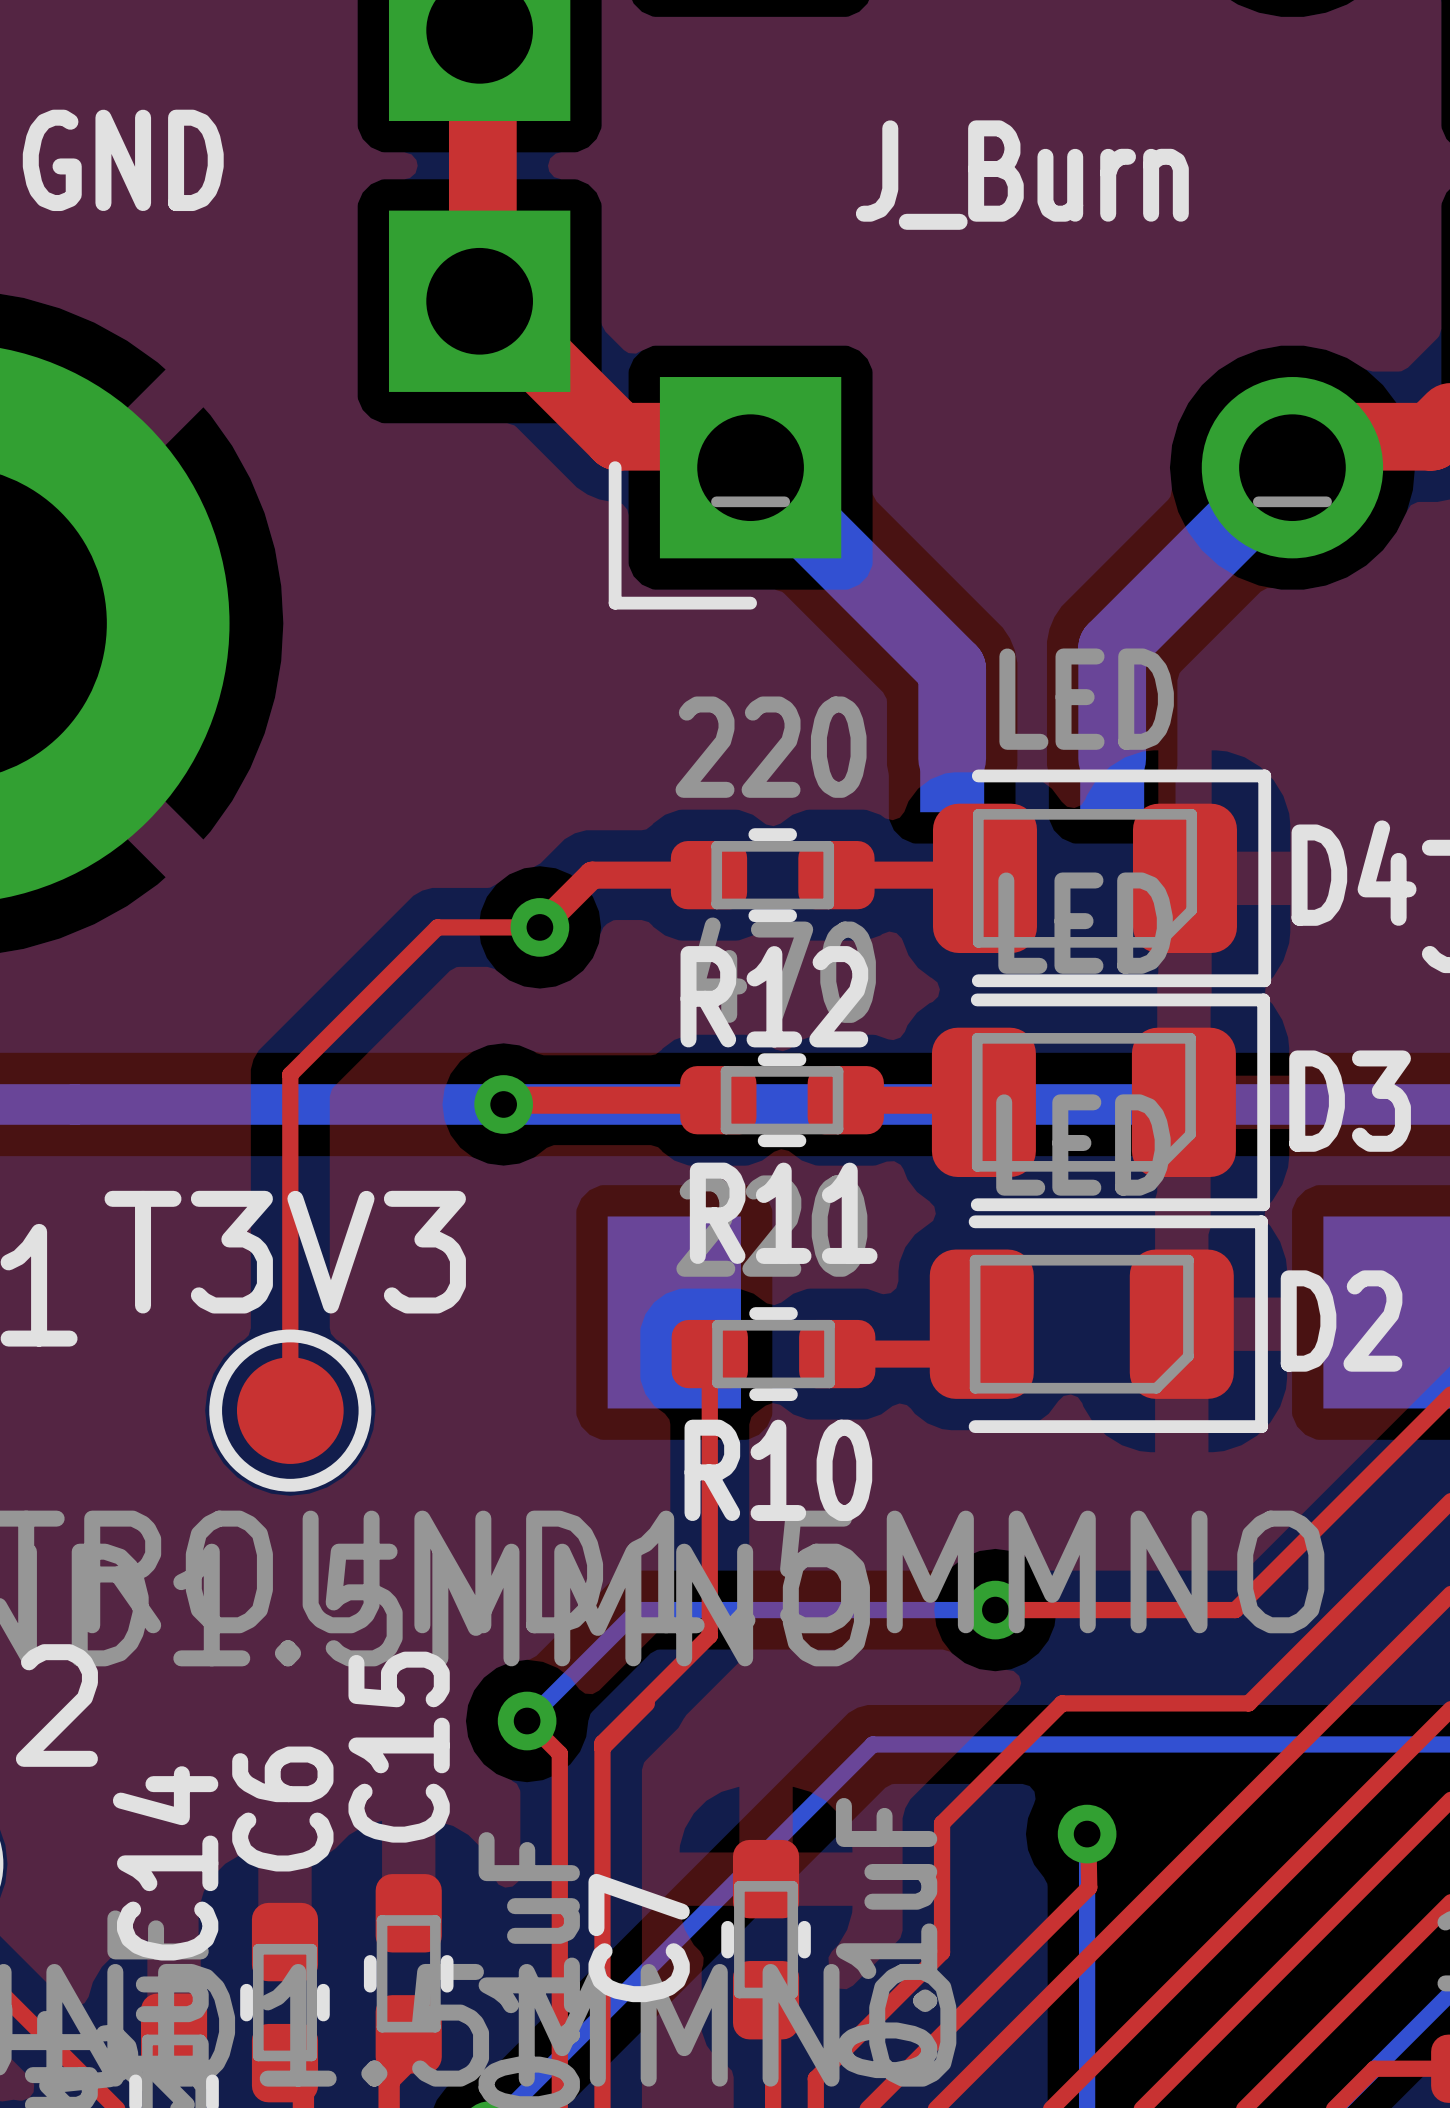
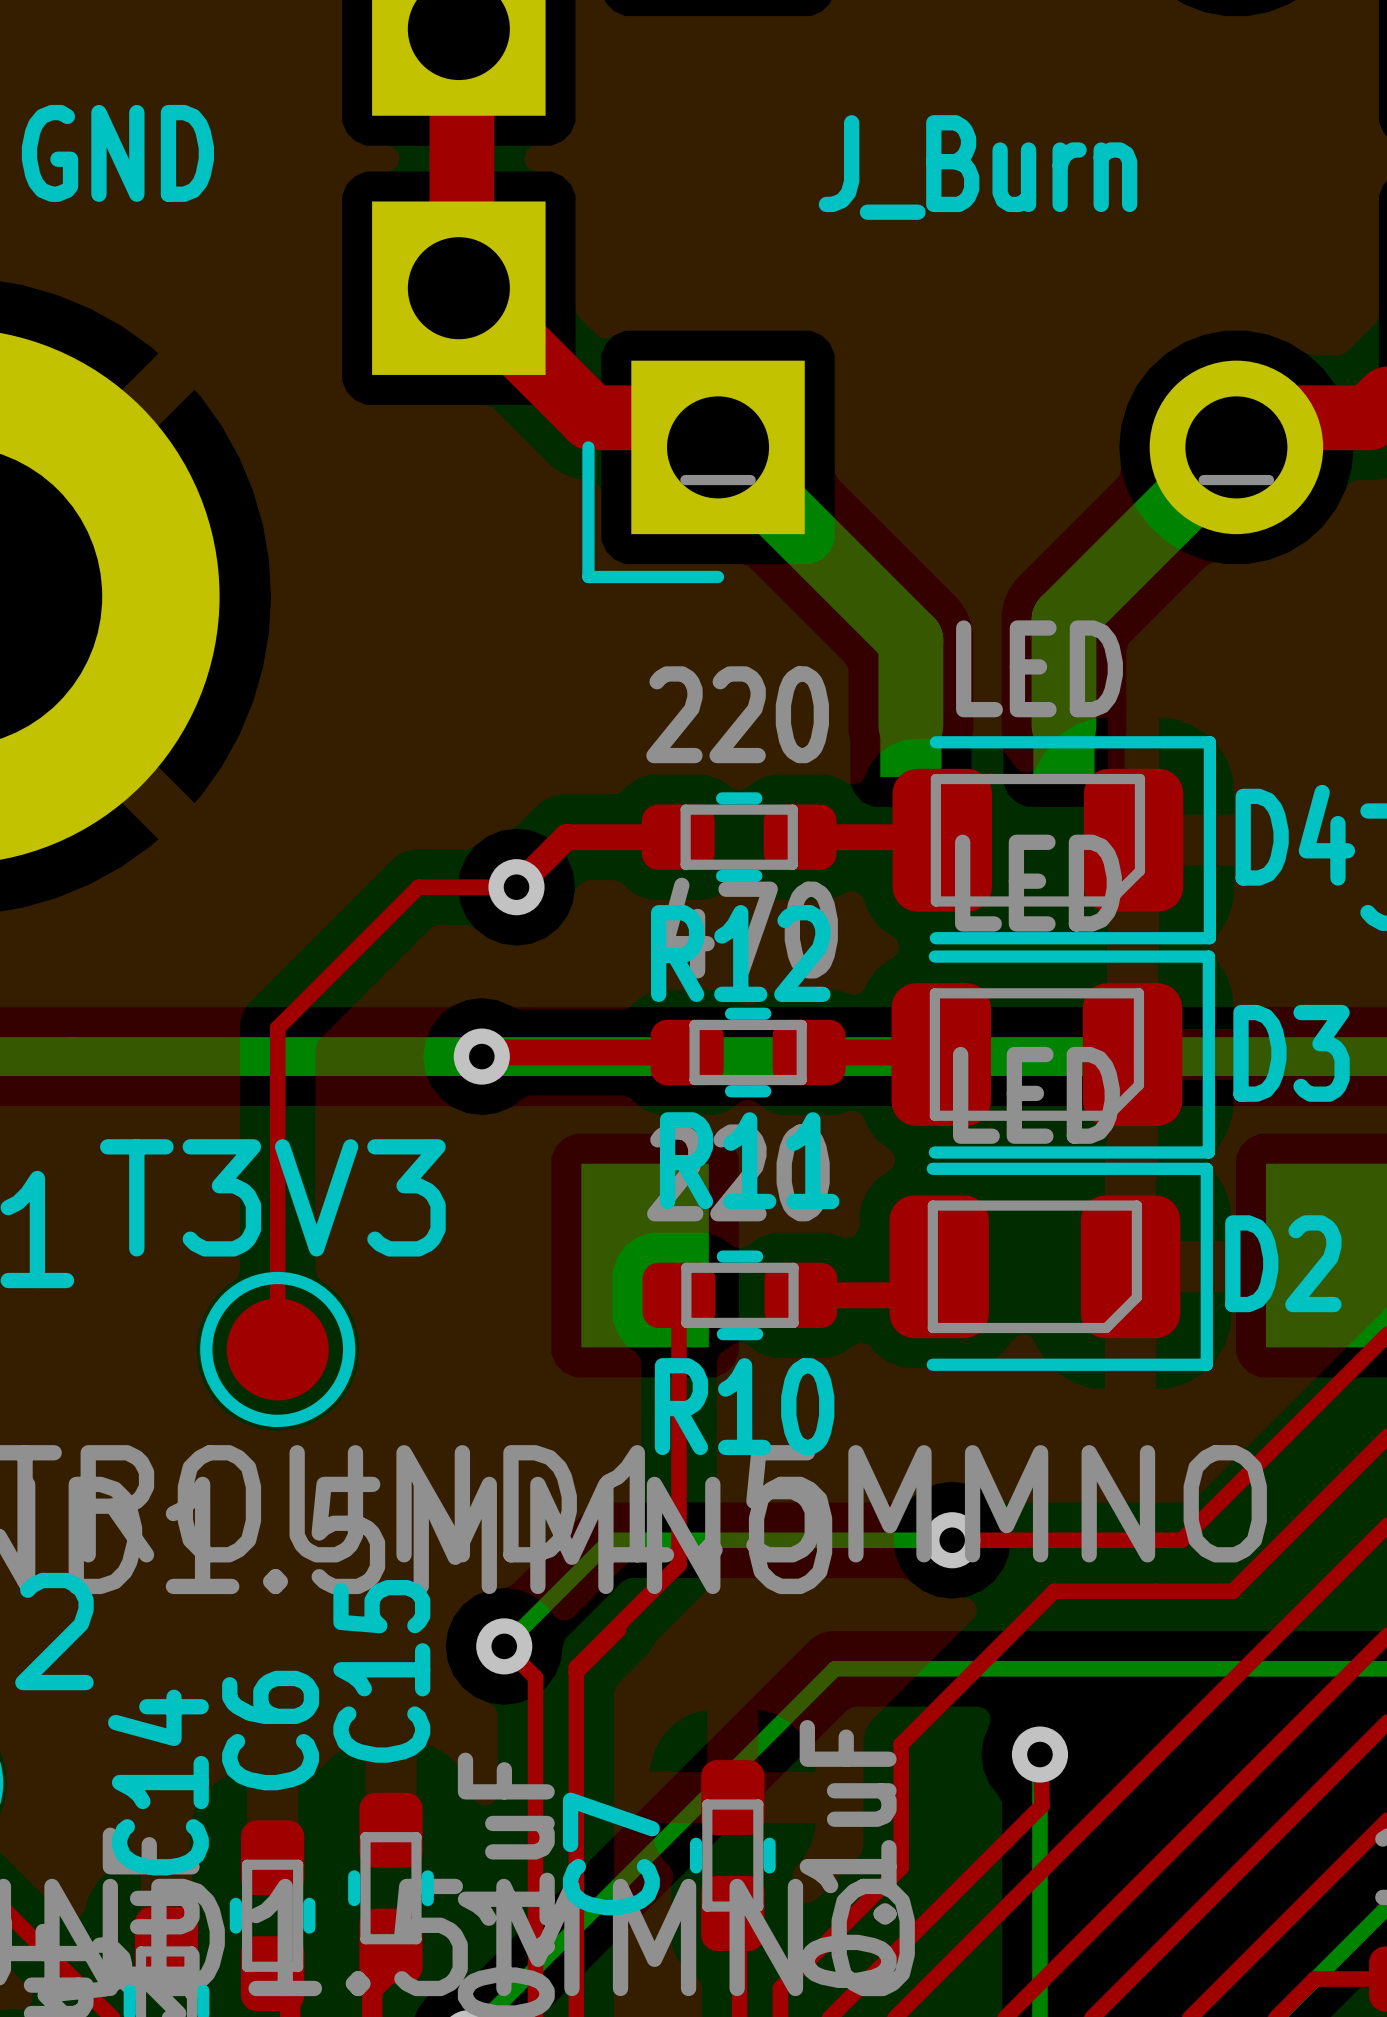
top track: (1288, 1663) (1248, 1703) (1062, 1703) -> (1232, 1591) (1054, 1591) (1015, 1629)

